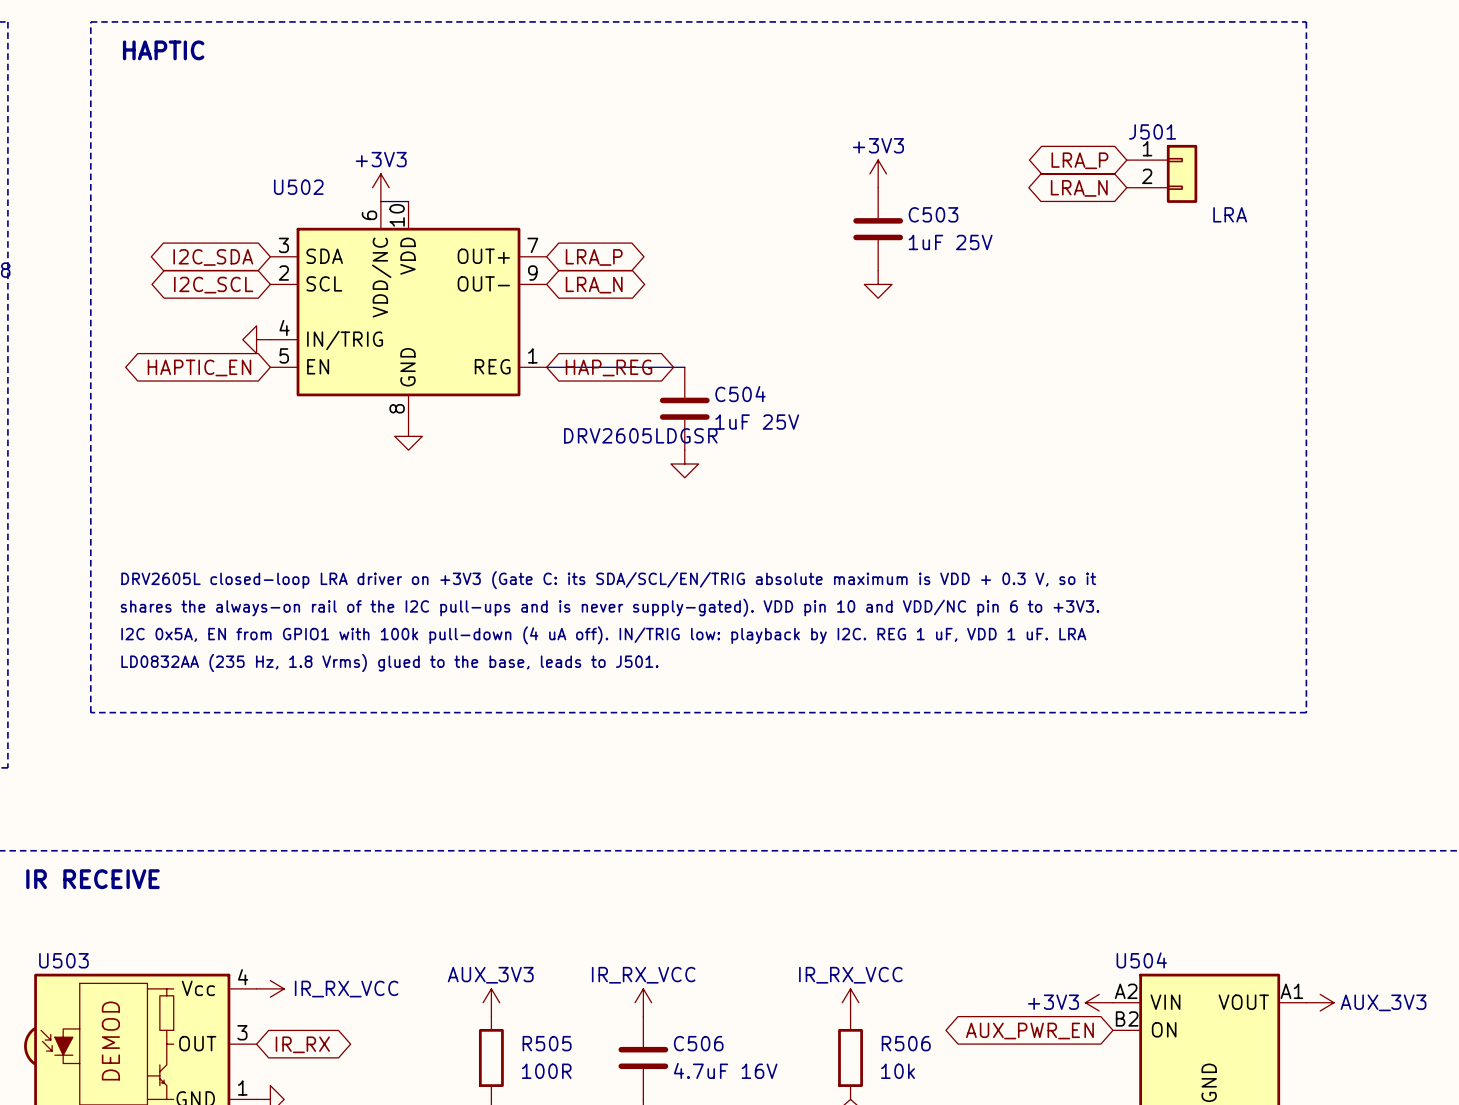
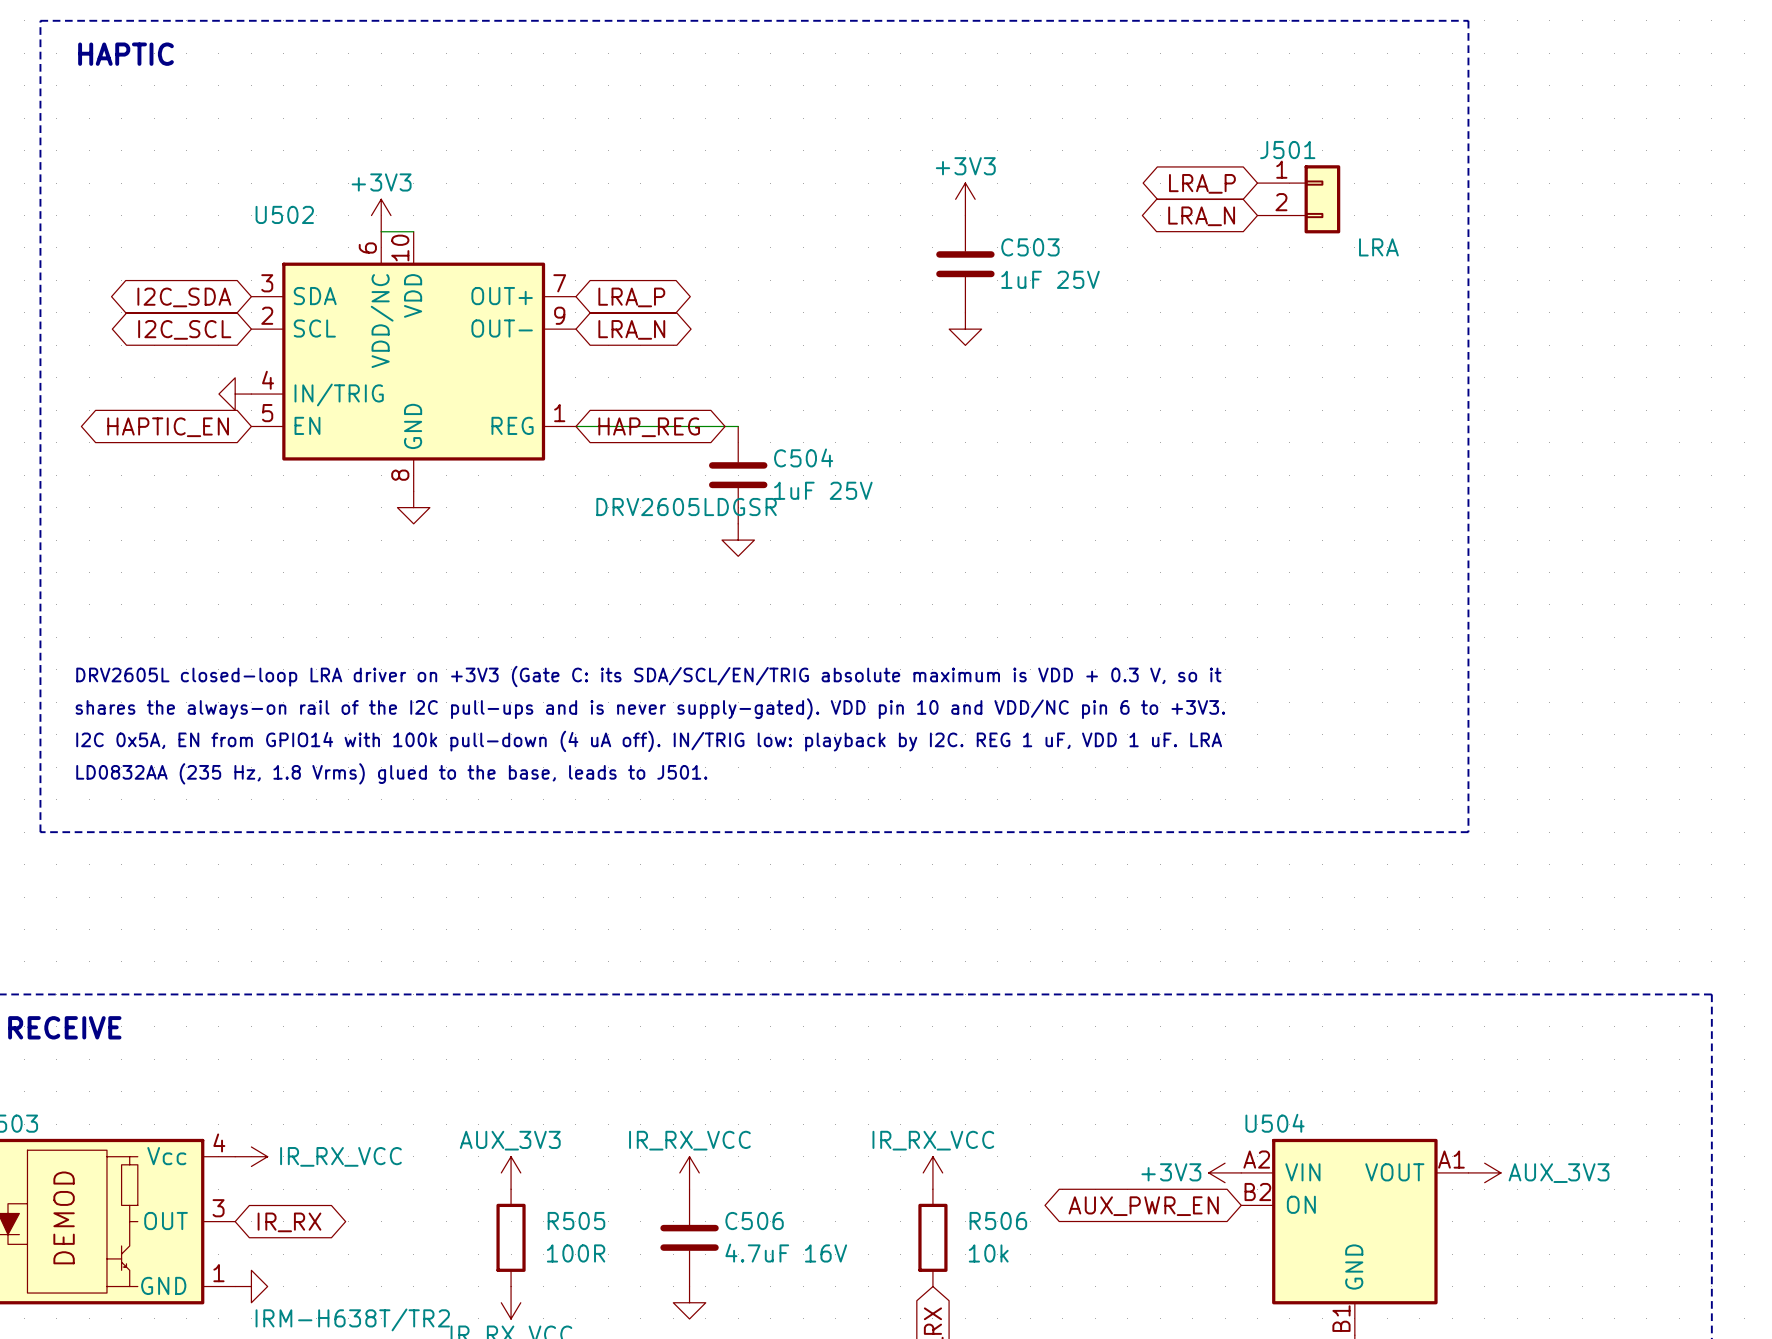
text: I2C 0x5A, EN from GPIO1 with 100k pull-down (4 uA off). IN/TRIG low: playback by I2C. REG 1 uF, VDD 1 uF. LRA (603, 635) -> I2C 0x5A, EN from GPIO14 with 100k pull-down (4 uA off). IN/TRIG low: playback by I2C. REG 1 uF, VDD 1 uF. LRA (649, 741)

